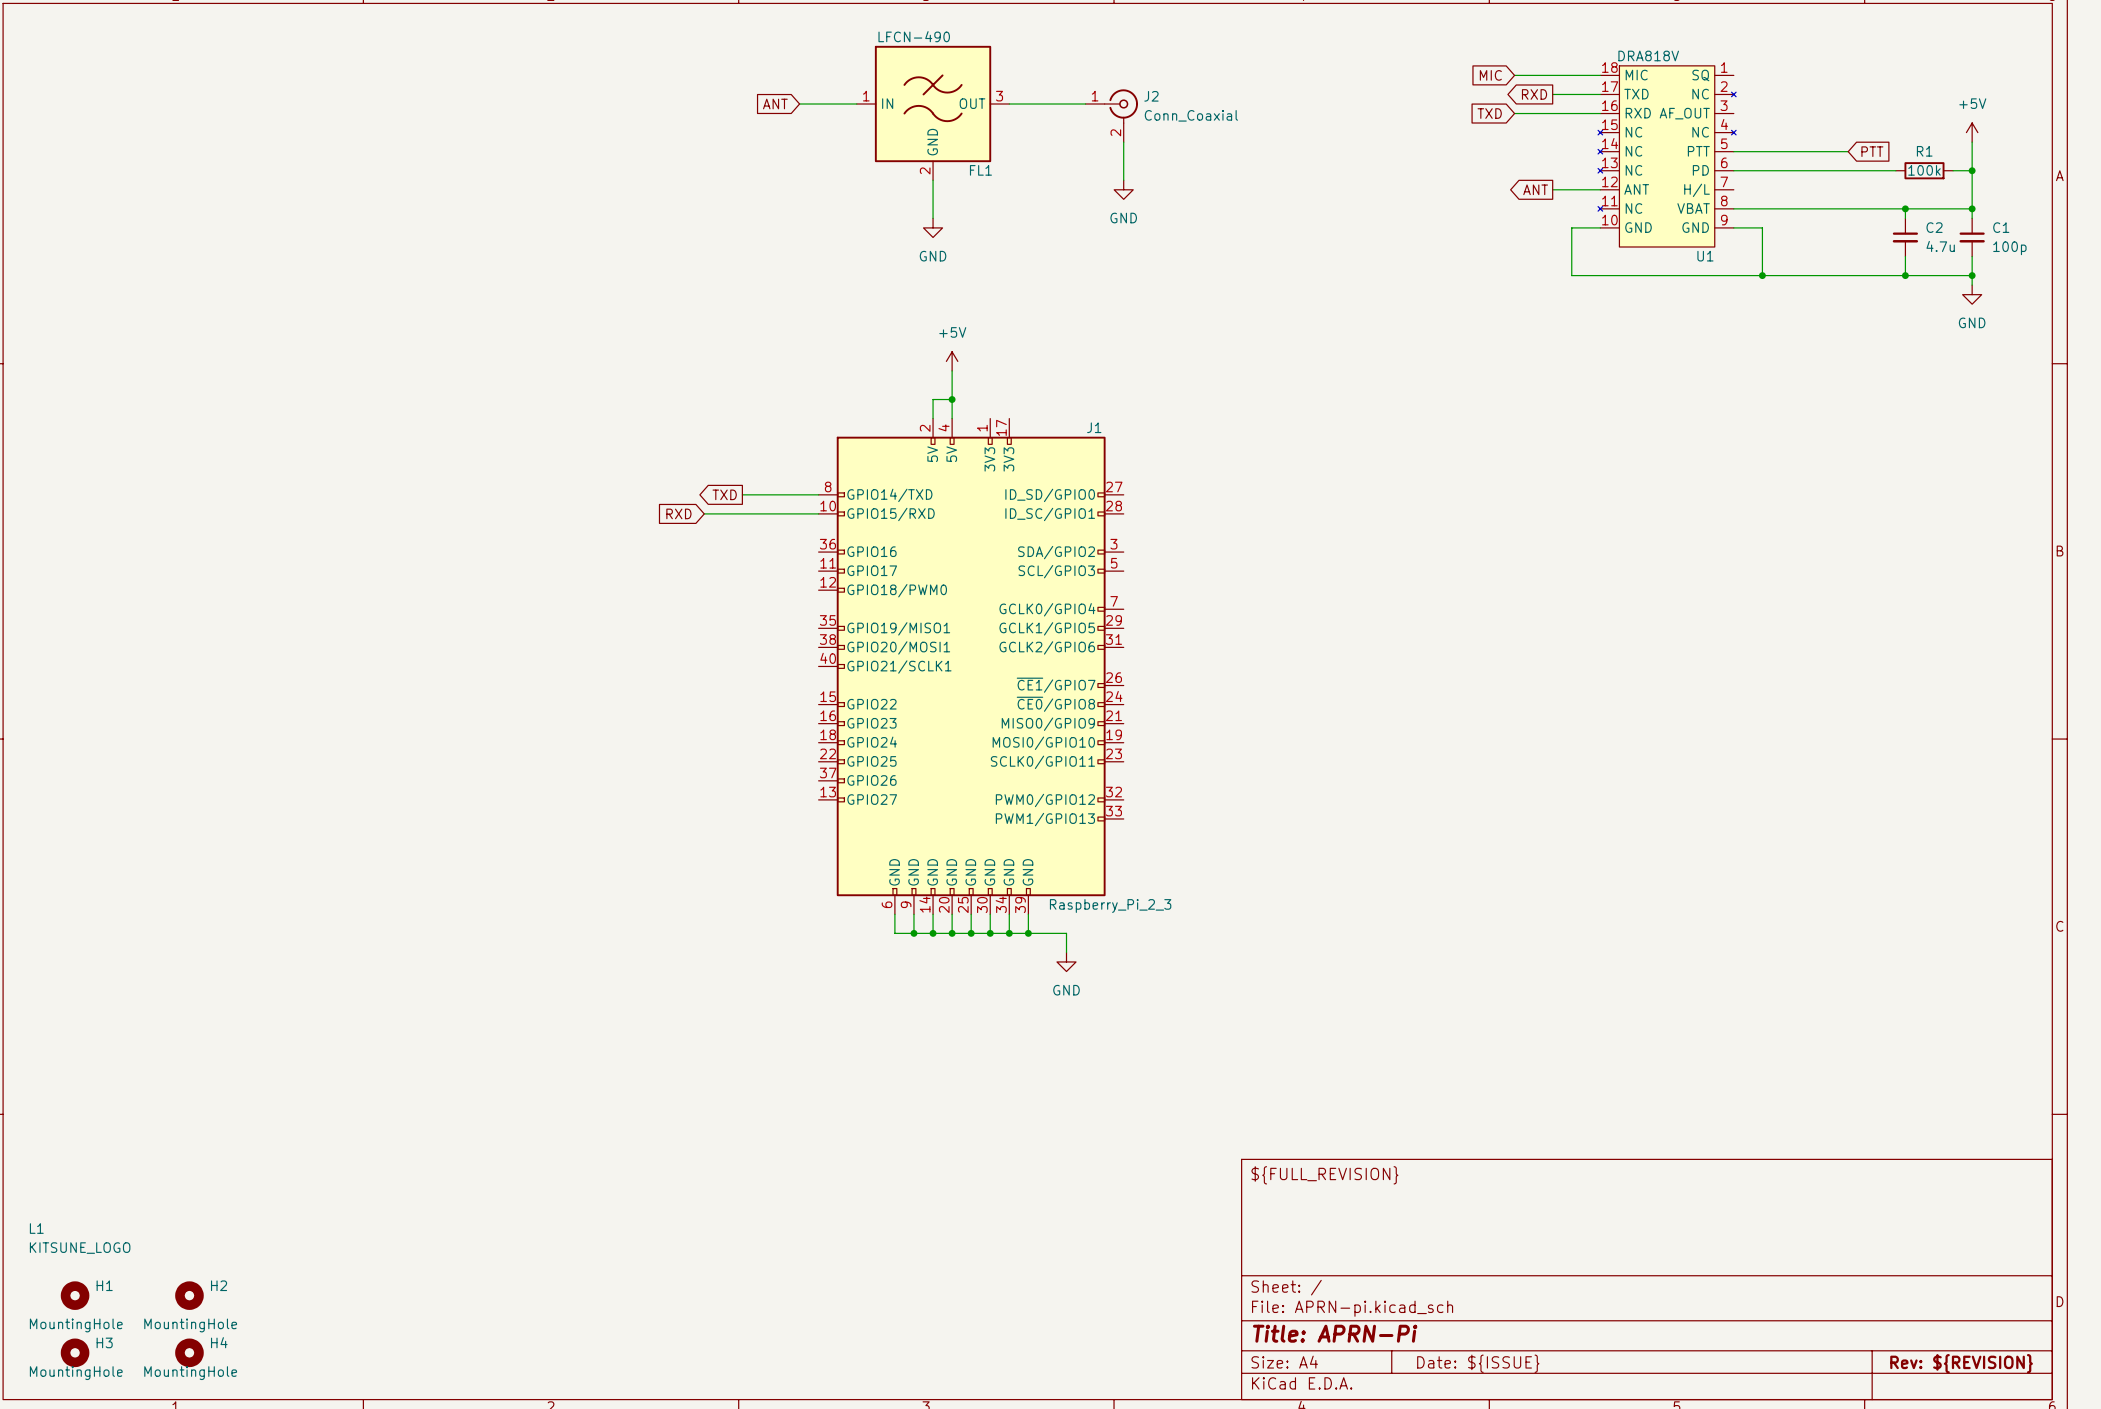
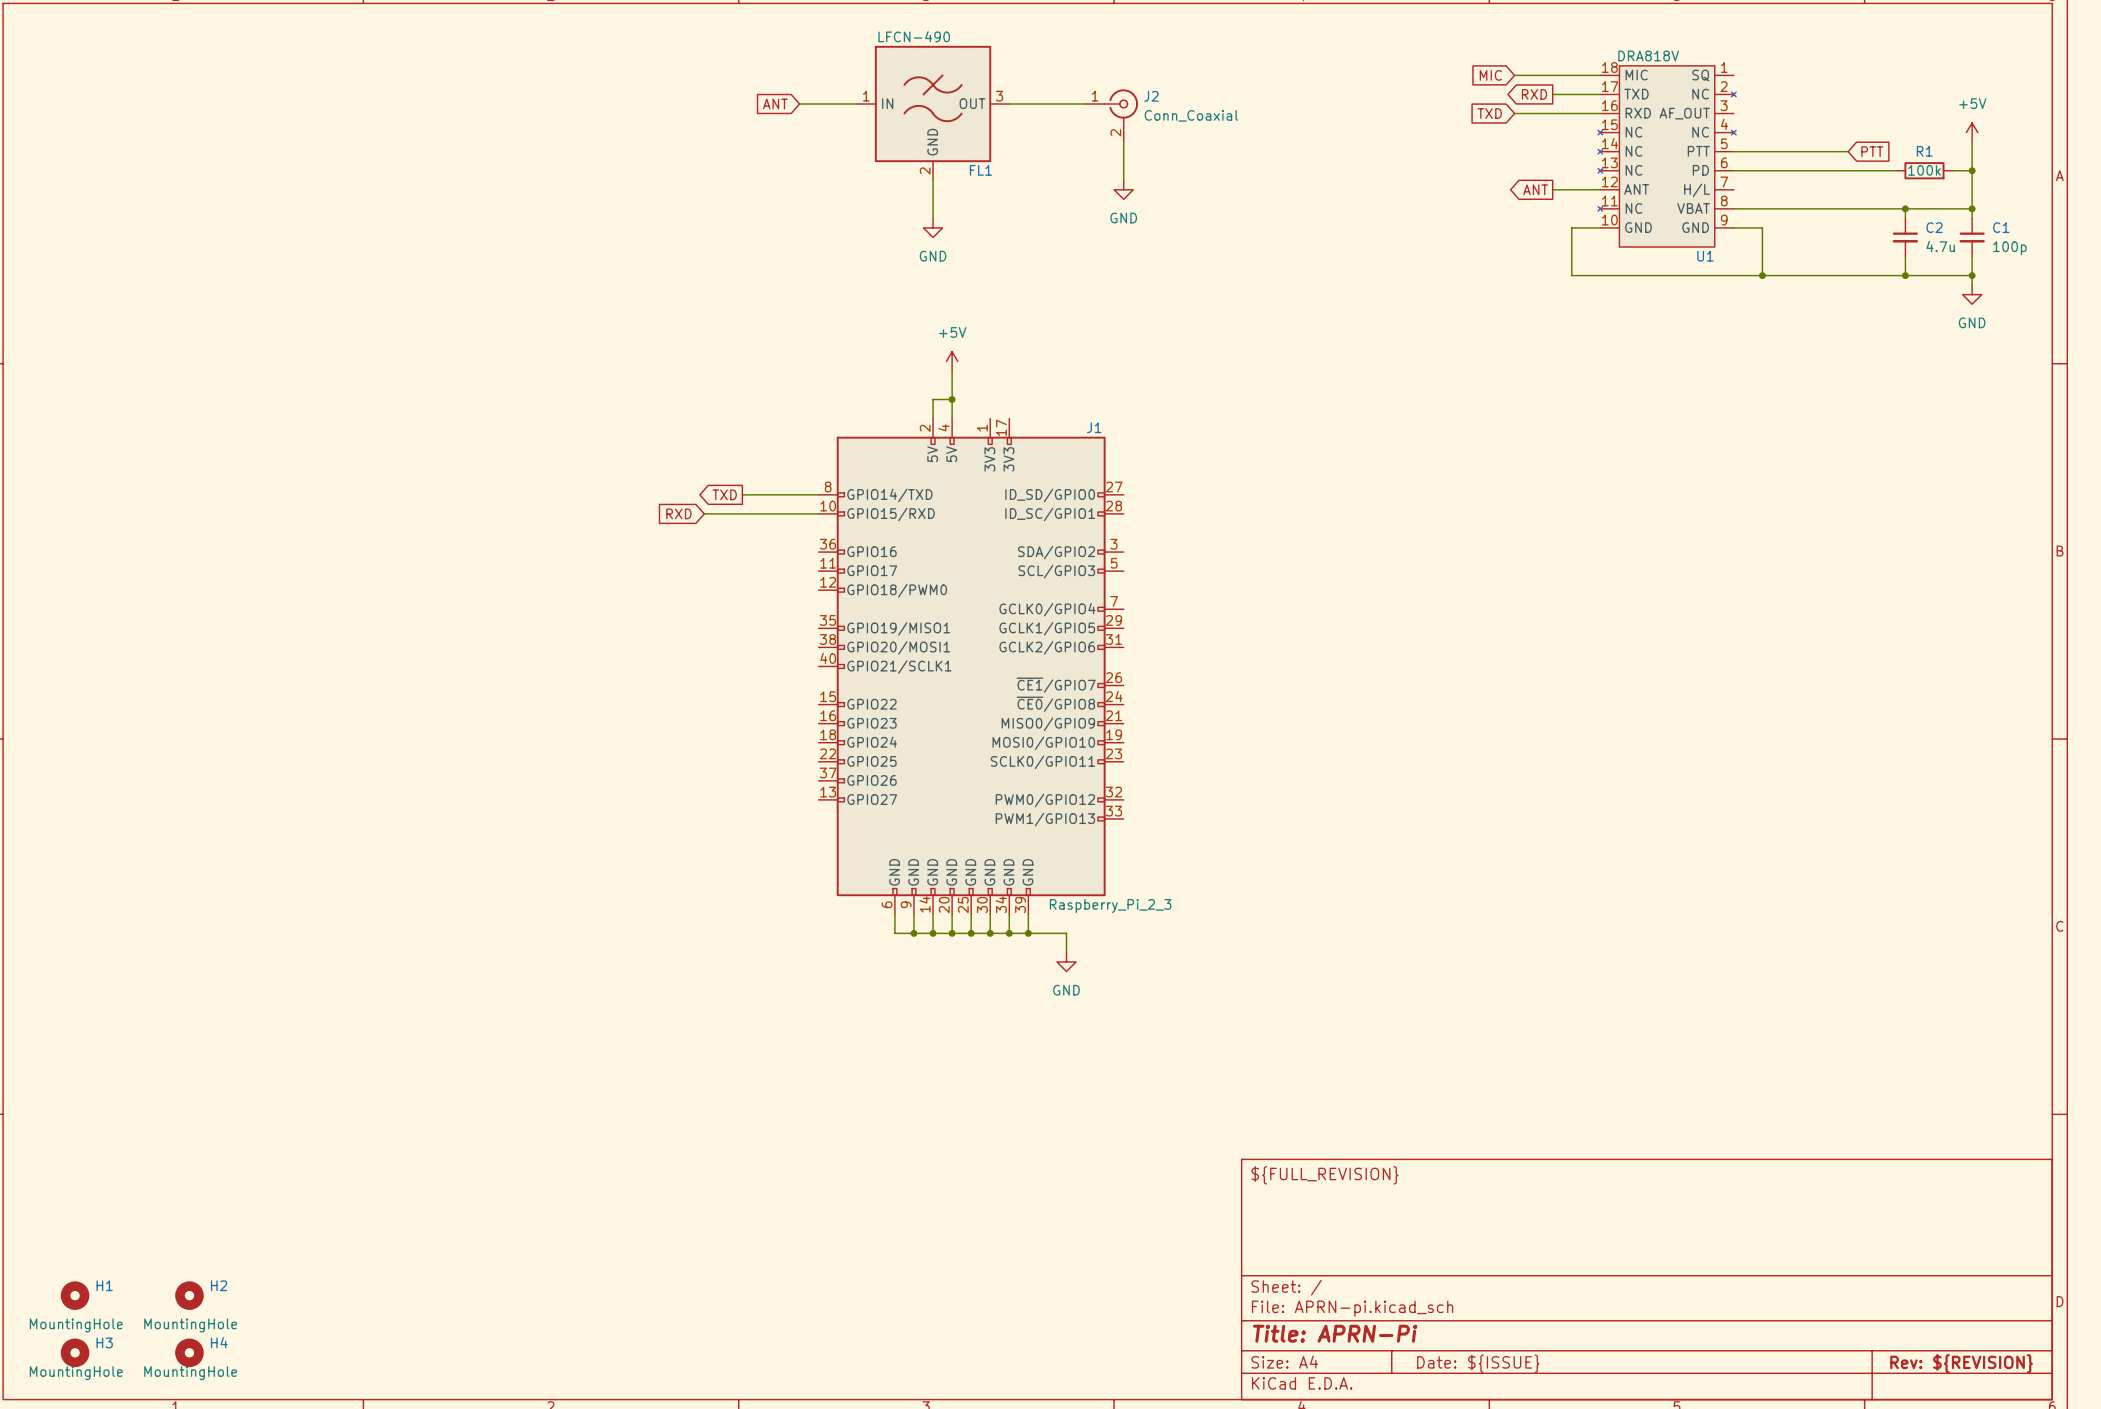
L1: KITSUNE_LOGO (80, 1238) -> none

